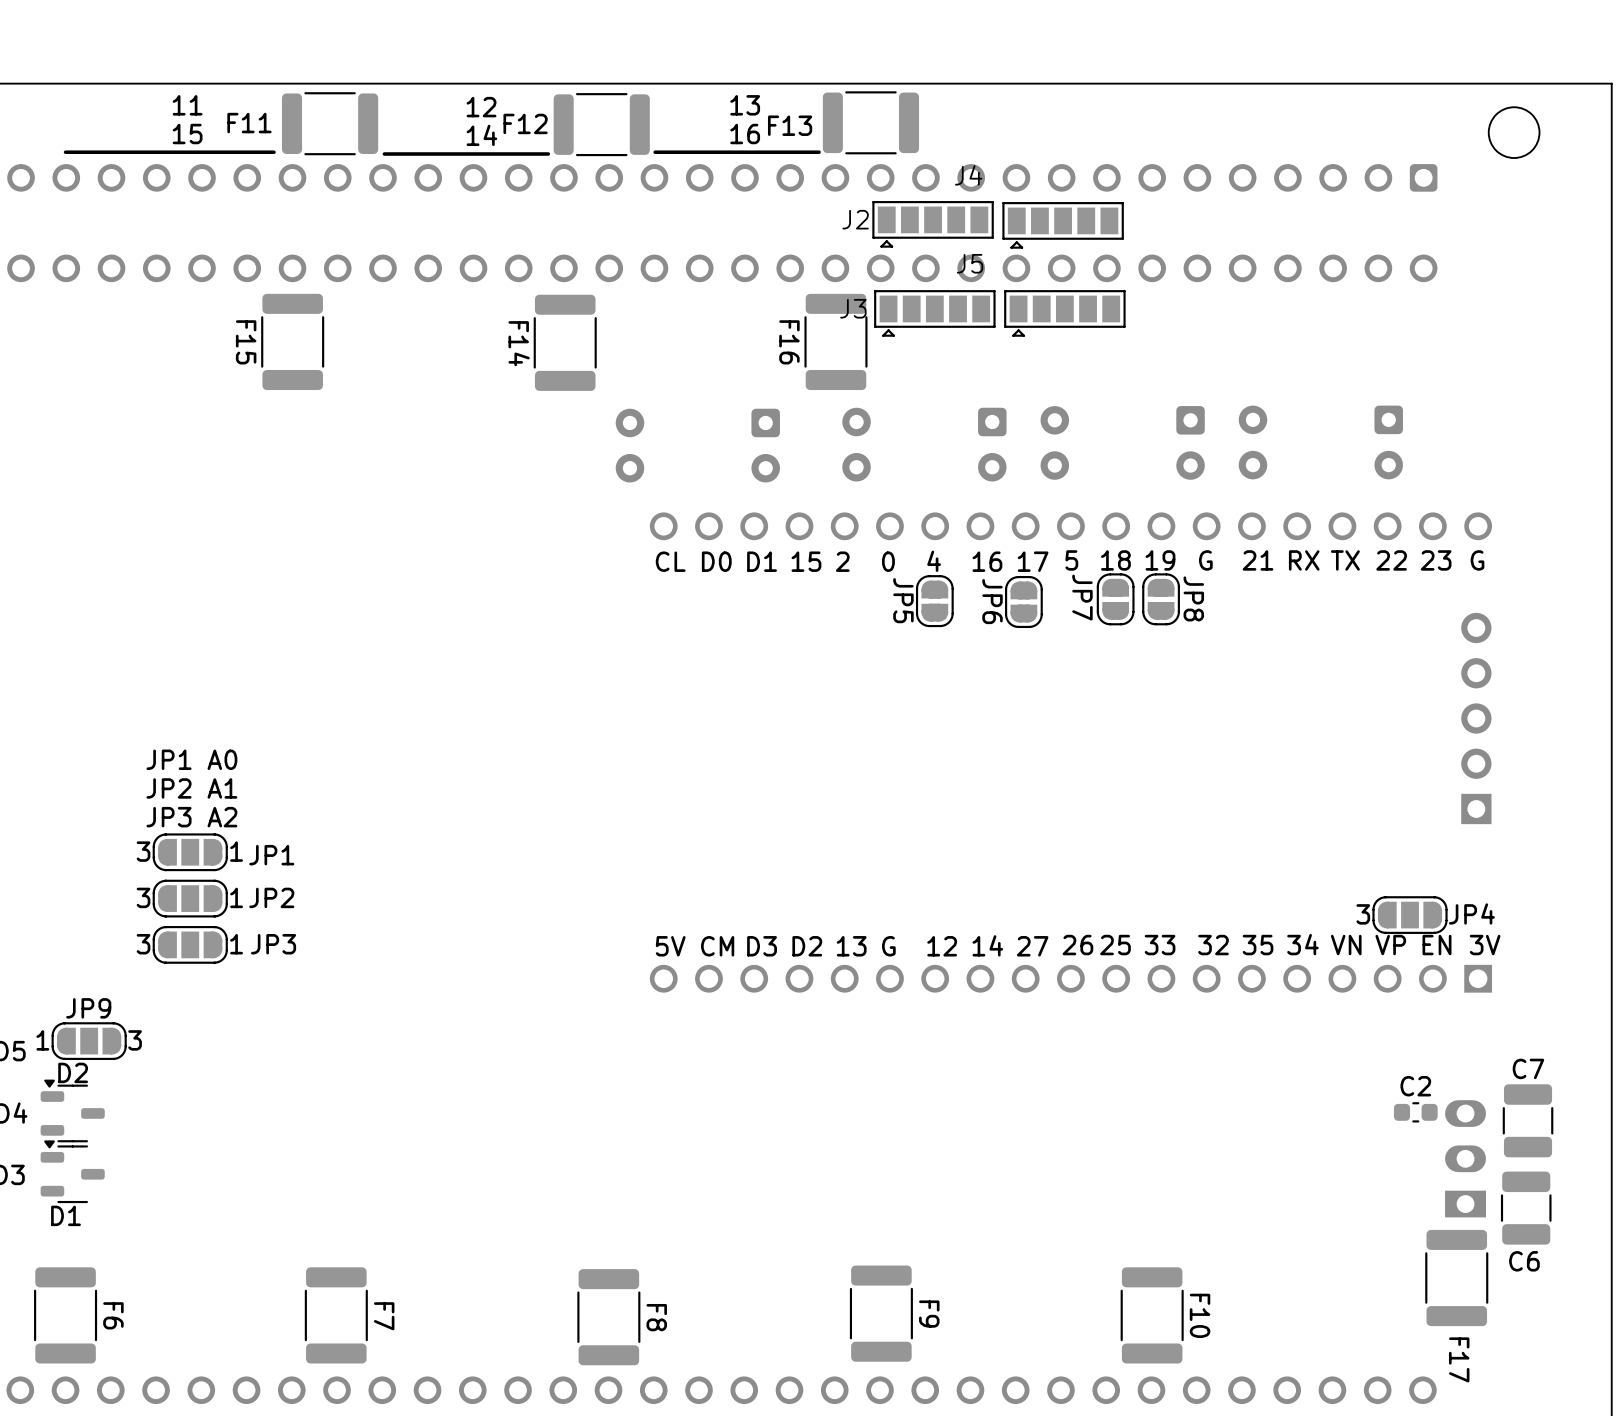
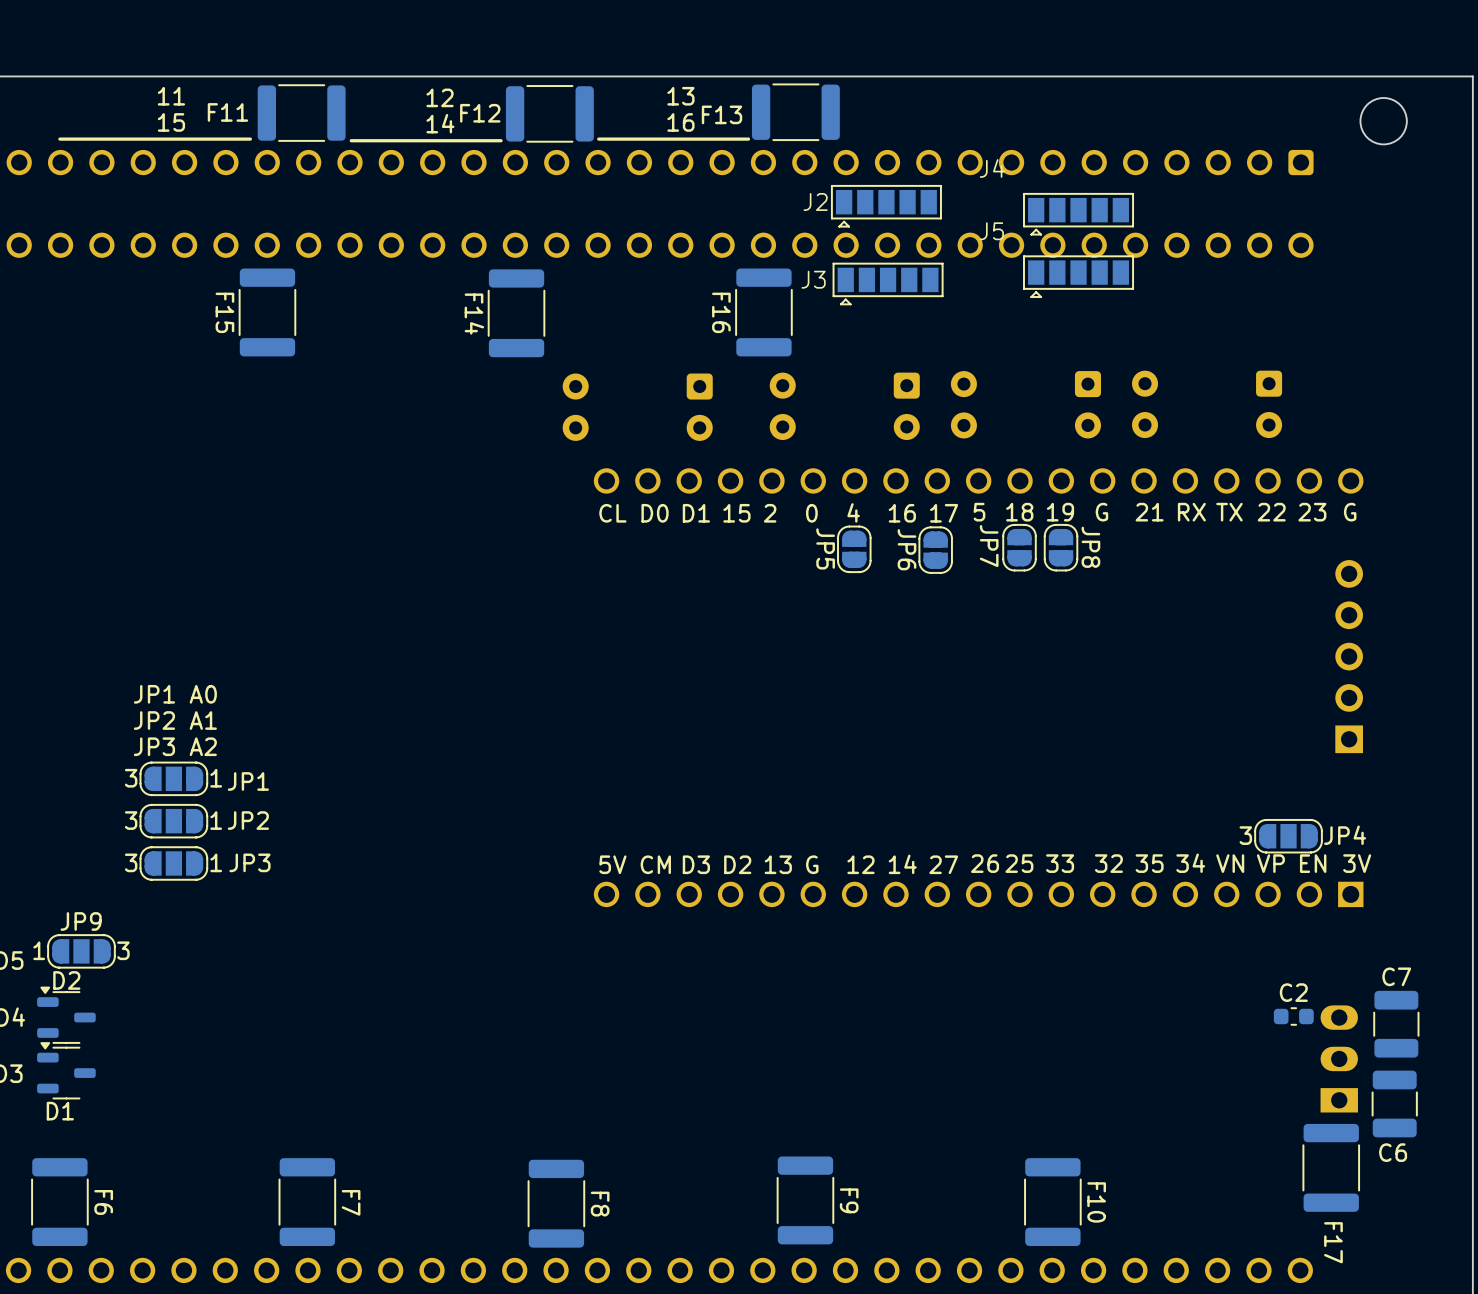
J2 position: (933, 224) -> (886, 206)
J4 position: (1063, 225) -> (1078, 214)
J3 position: (934, 313) -> (888, 283)
J5 position: (1064, 313) -> (1078, 276)

